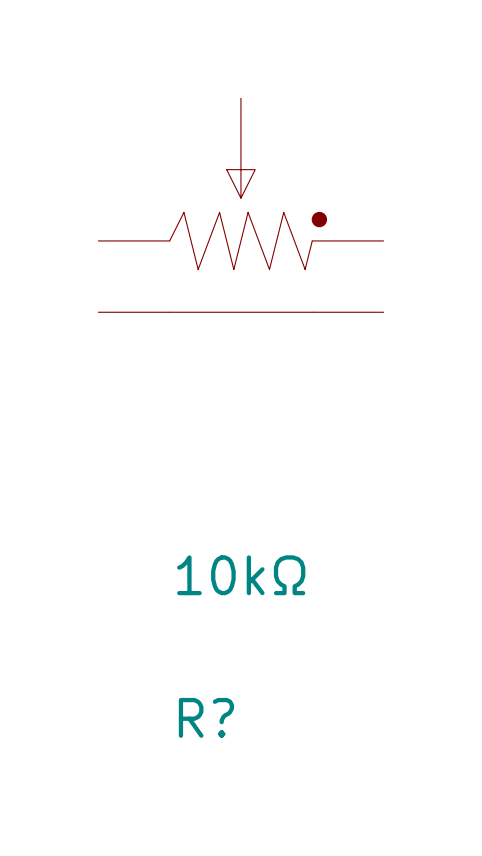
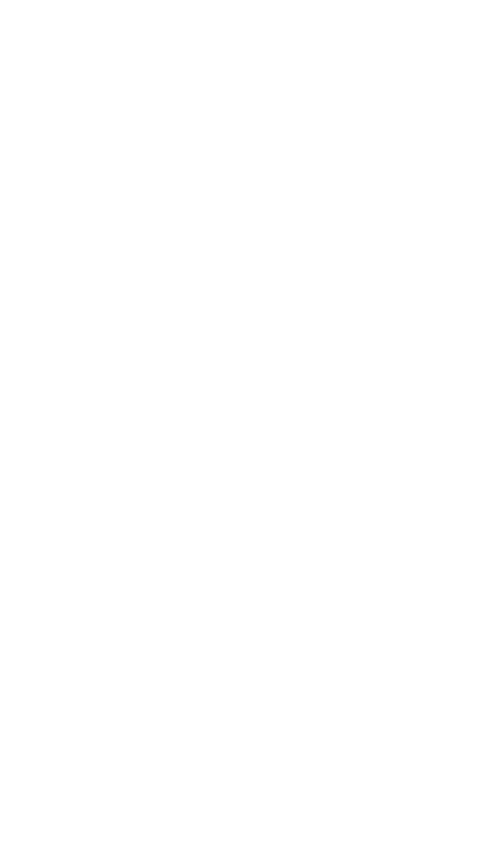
R?: 10kΩ (240, 205) -> none

